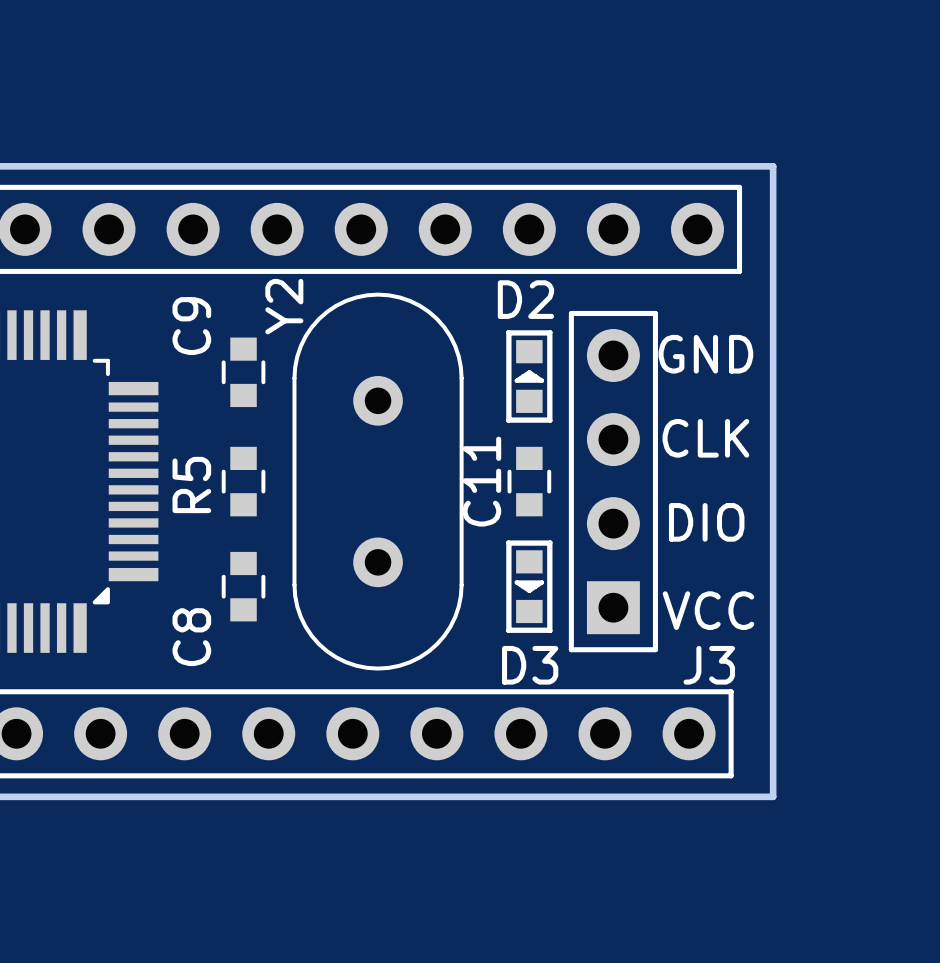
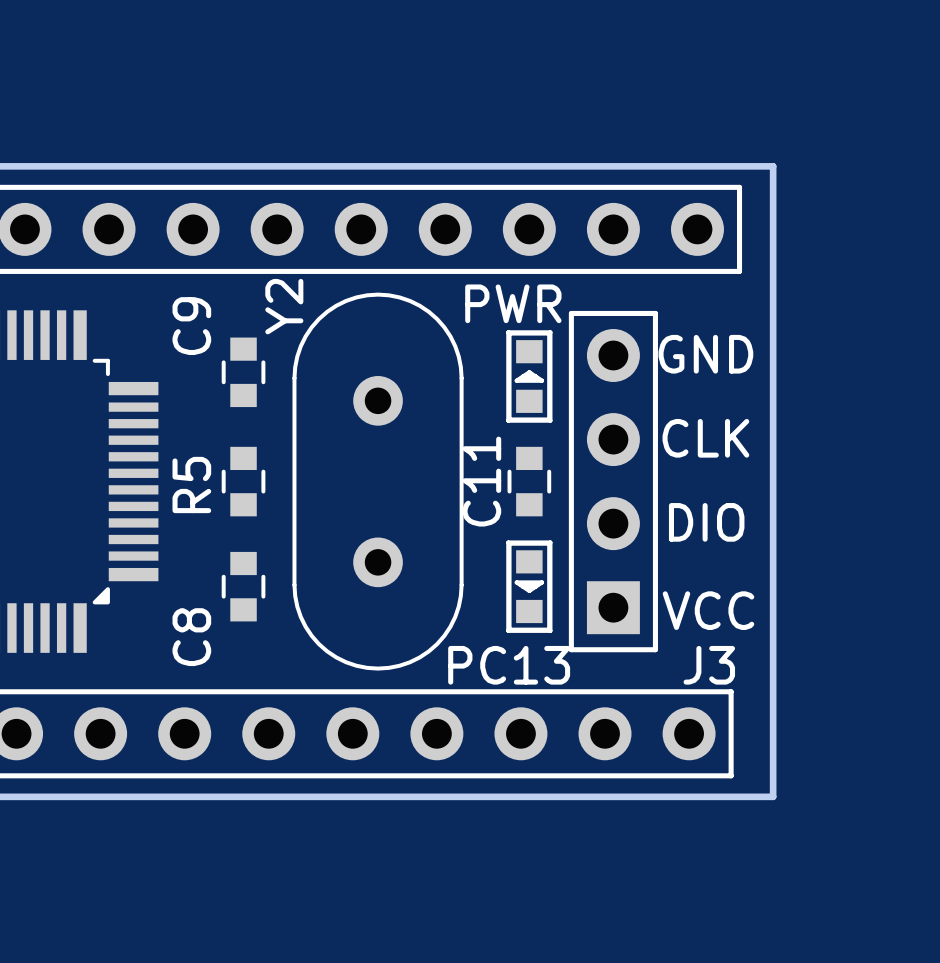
D2 name: D2 (525, 299) -> none
text: none -> PWR (513, 303)
text: none -> PC13 (509, 665)
D3 name: D3 (530, 665) -> none

